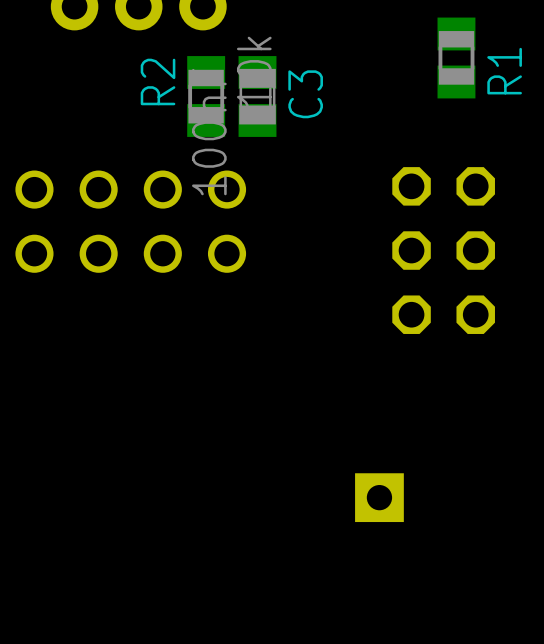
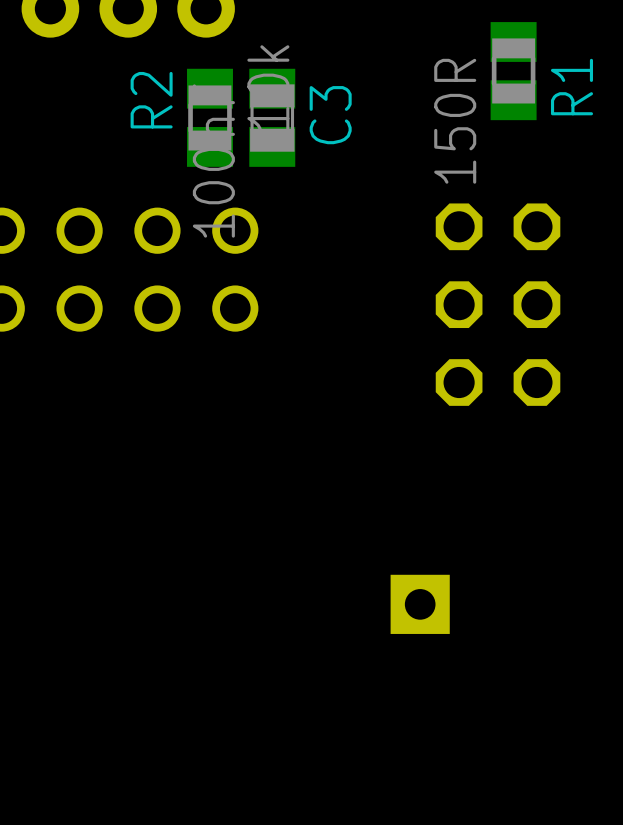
R1 value: none -> 150R (455, 121)

